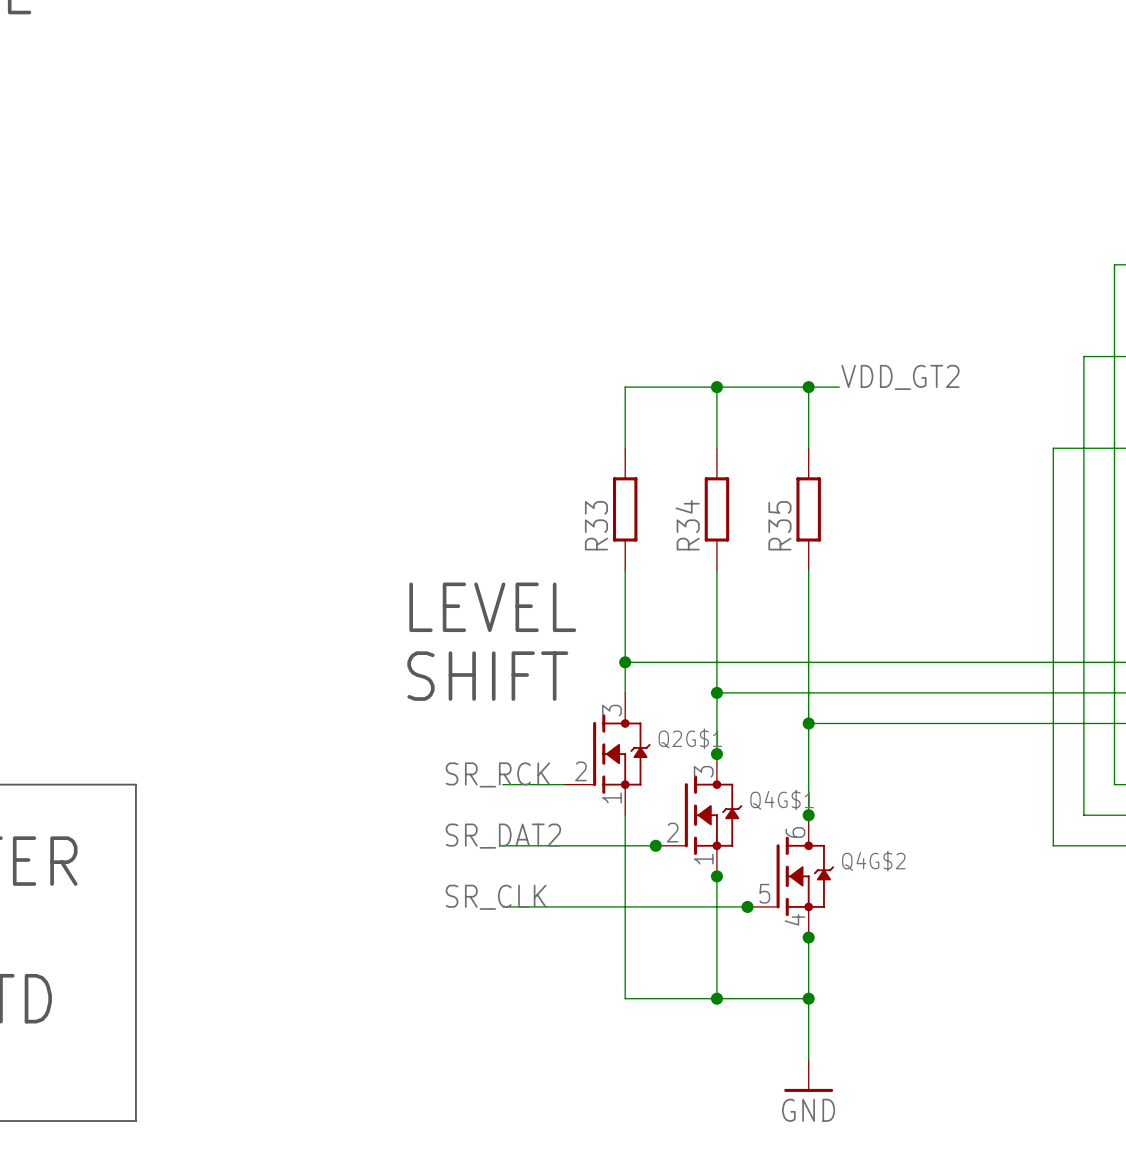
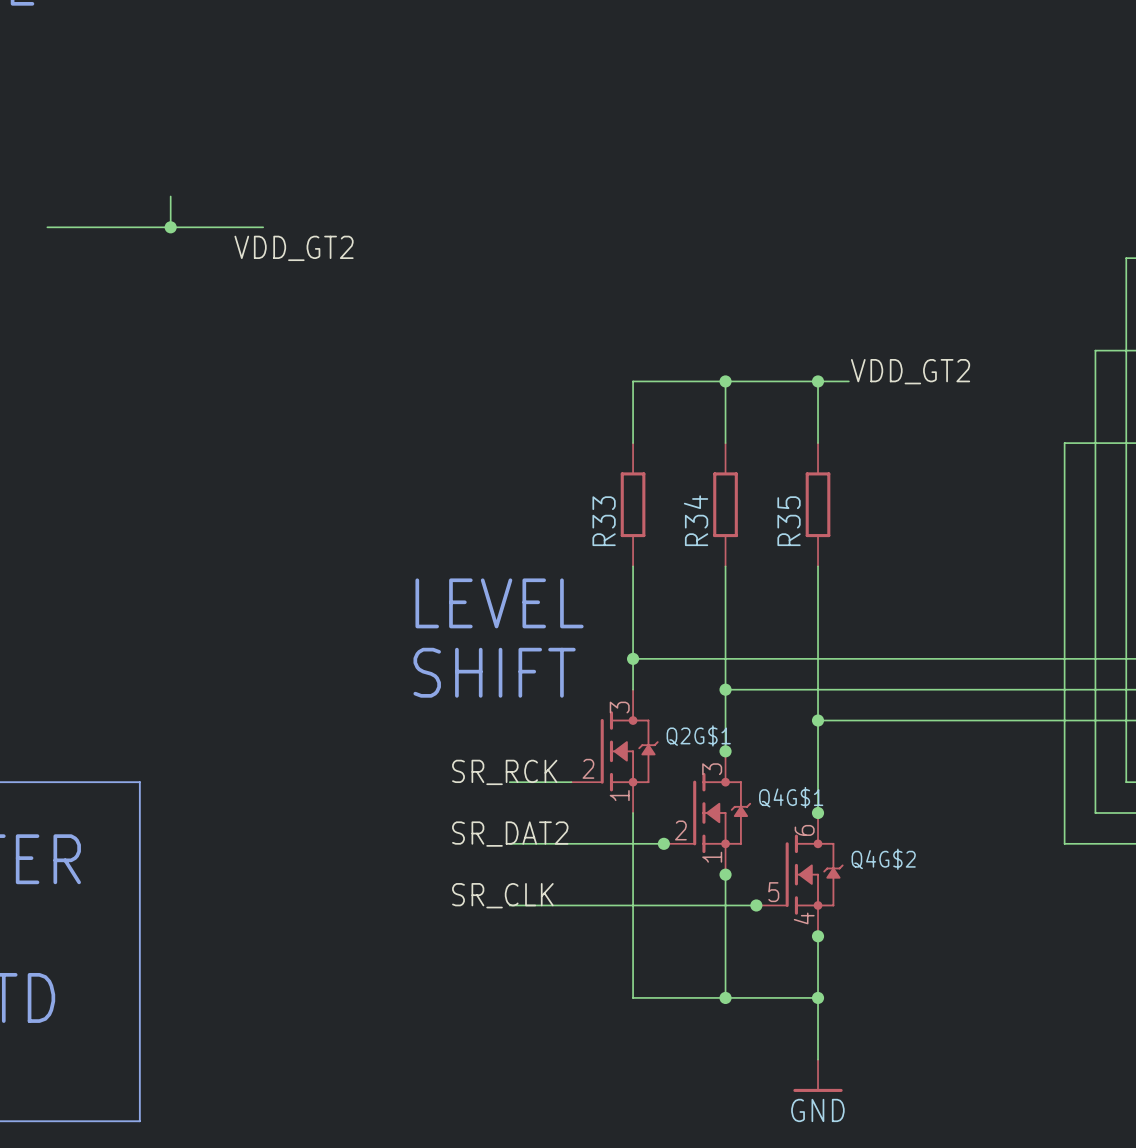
wire: none -> (170, 196) (170, 227)
wire: none -> (47, 227) (263, 227)
junction: none -> (170, 227)
label: none -> VDD_GT2 (294, 248)

